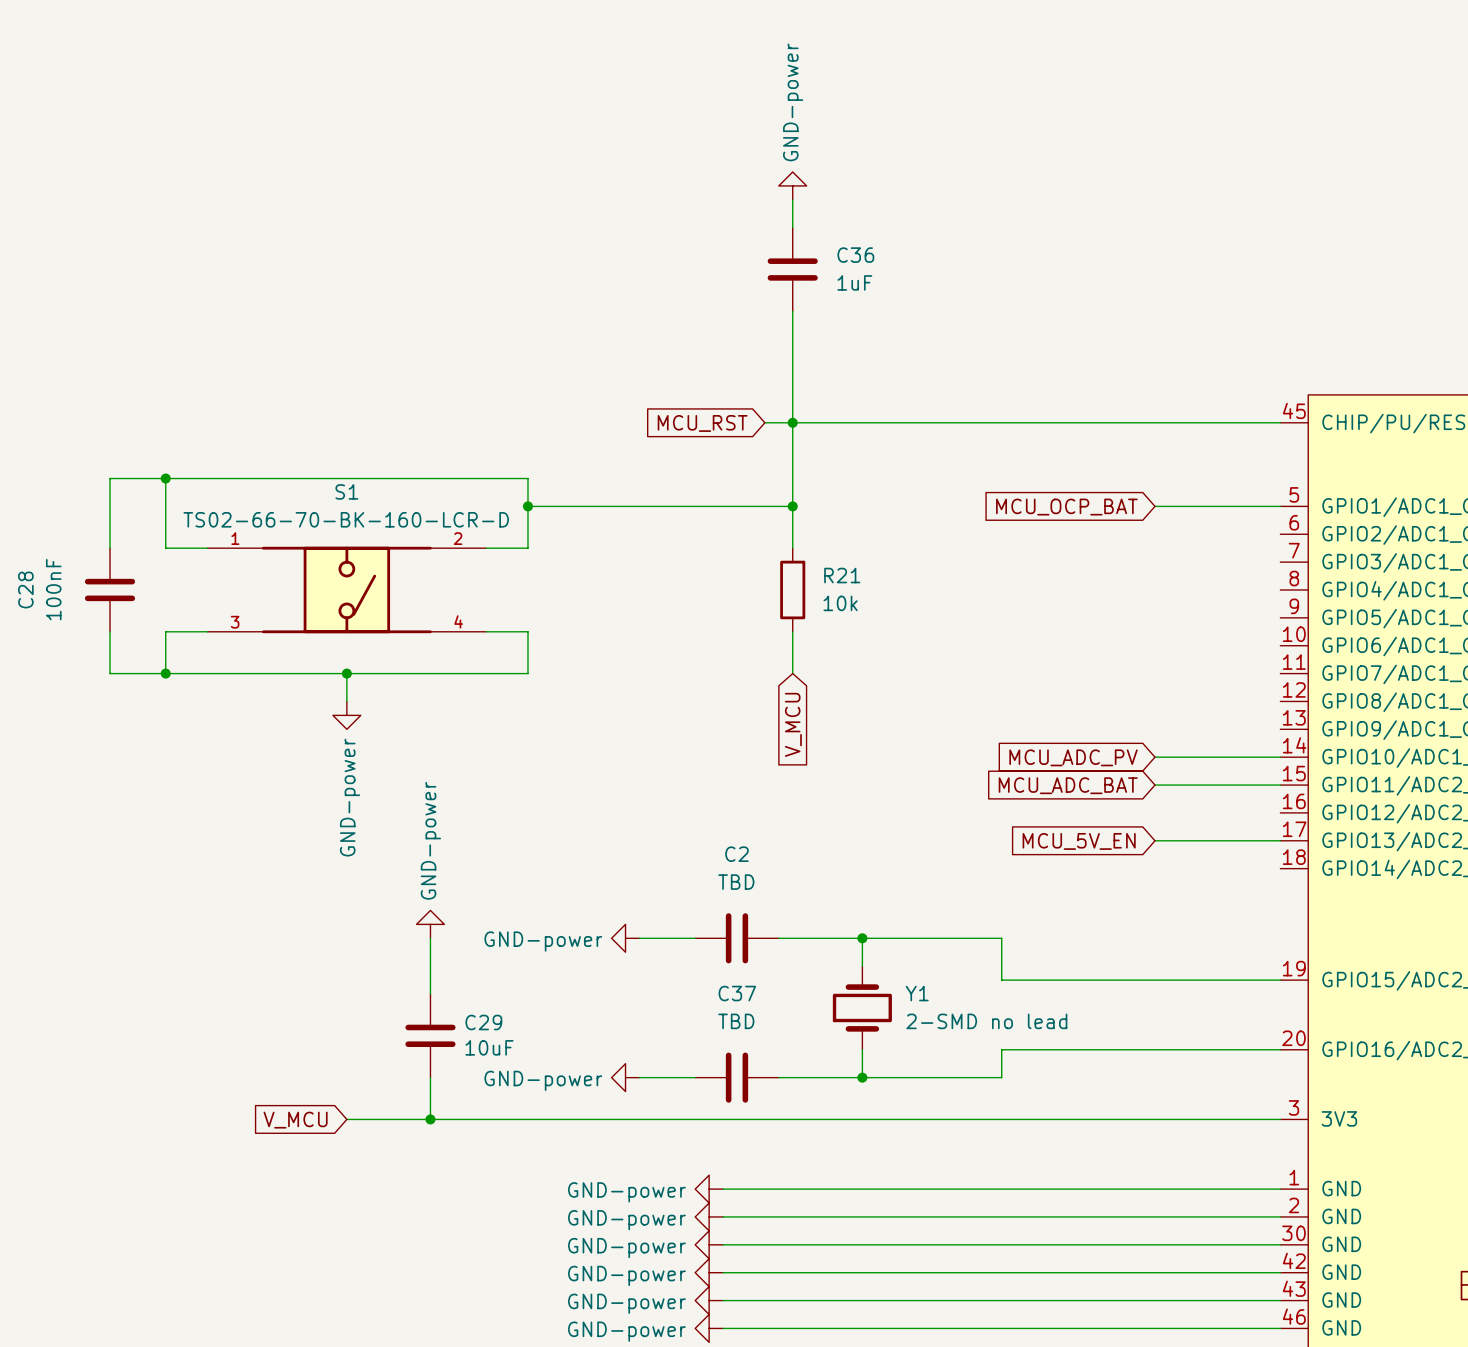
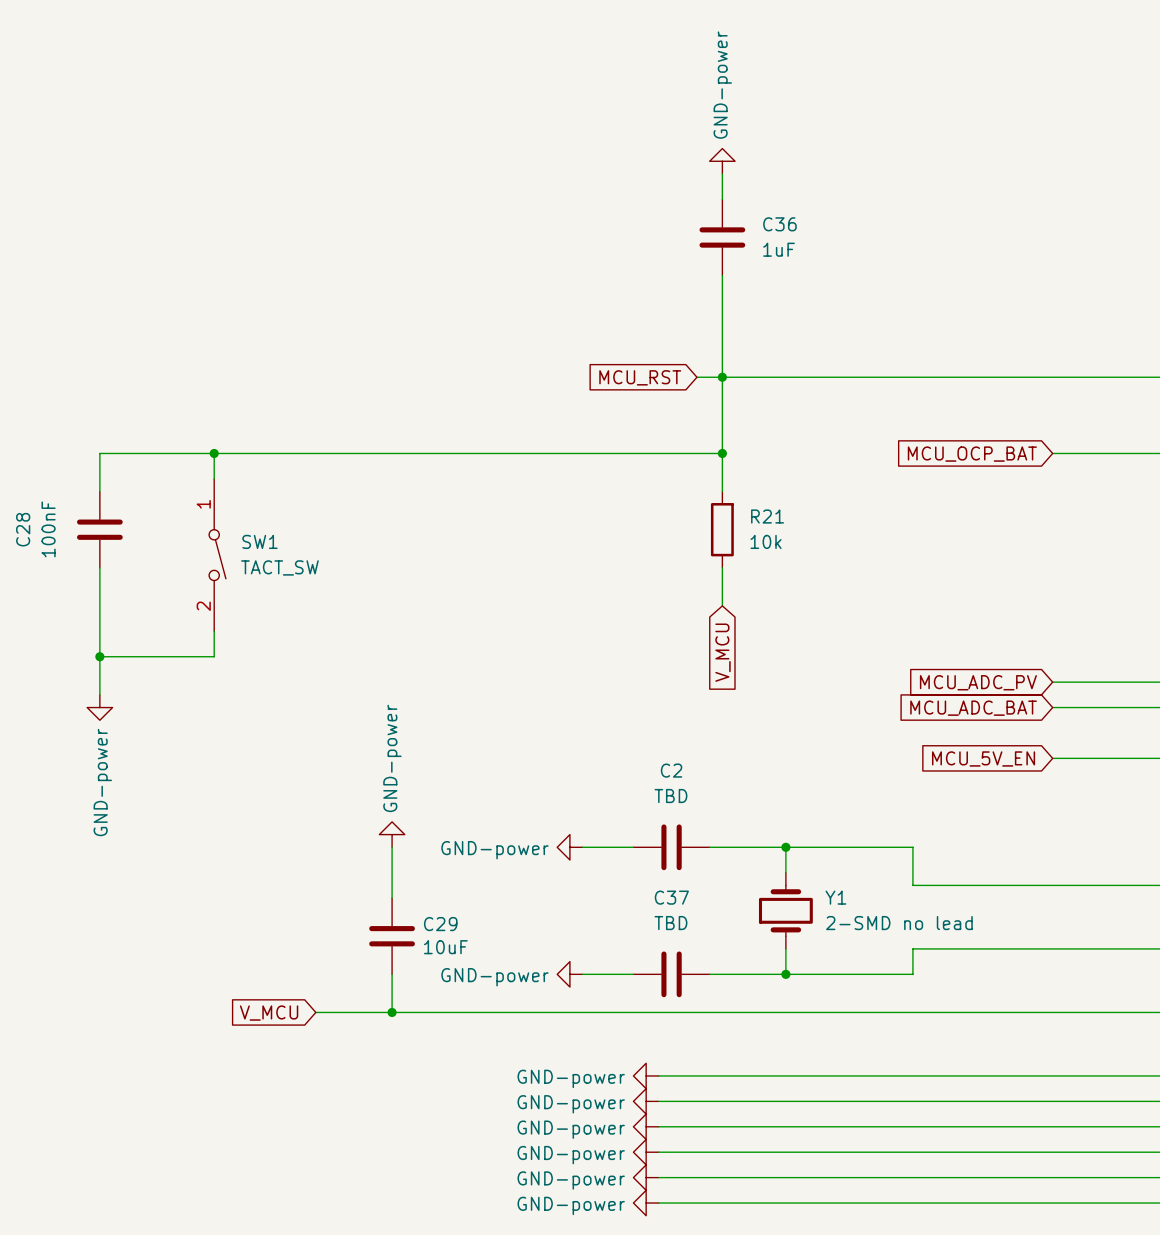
wire: (165, 478) (165, 548) (207, 548) -> none
junction: (165, 478) -> none
wire: (110, 506) (110, 478) (527, 478) (527, 548) (486, 548) -> (99, 453) (480, 453)
junction: none -> (214, 453)
junction: (527, 506) -> none
S1: TS02-66-70-BK-160-LCR-D (346, 589) -> none
SW1: none -> TACT_SW (217, 555)
wire: (207, 631) (165, 631) (165, 673) -> none
wire: (486, 631) (527, 631) (527, 673) (110, 673) -> (99, 694) (99, 605)
junction: (165, 673) -> none
wire: (346, 673) (346, 701) -> (214, 453) (214, 478)
junction: (346, 673) -> none
wire: none -> (214, 631) (214, 656) (99, 656)
power symbol position: GND-power (346, 715) -> GND-power (99, 707)
junction: none -> (99, 656)

